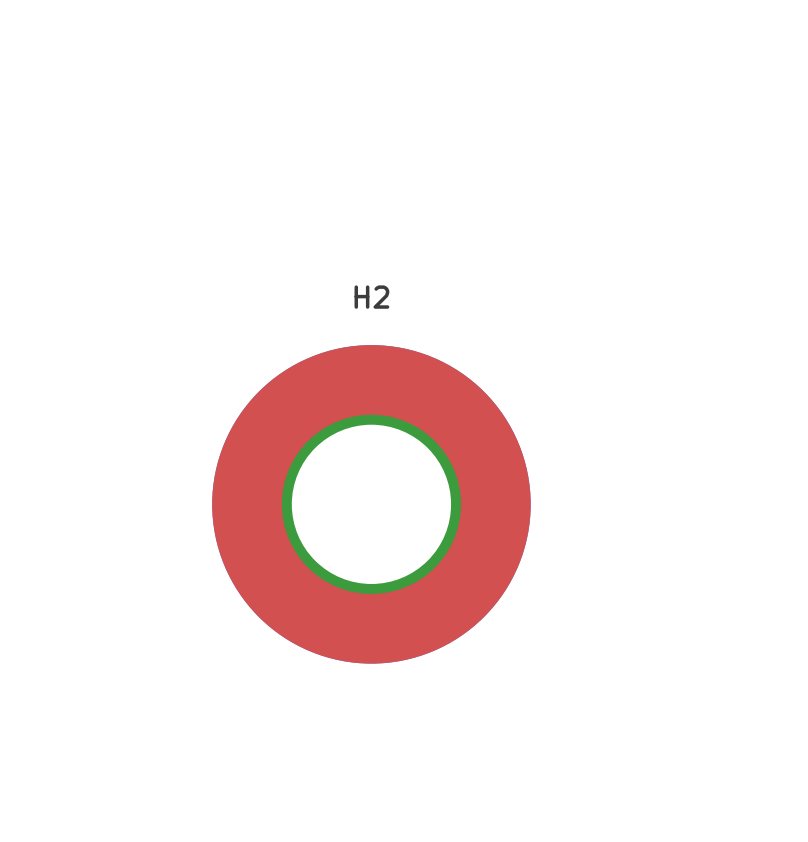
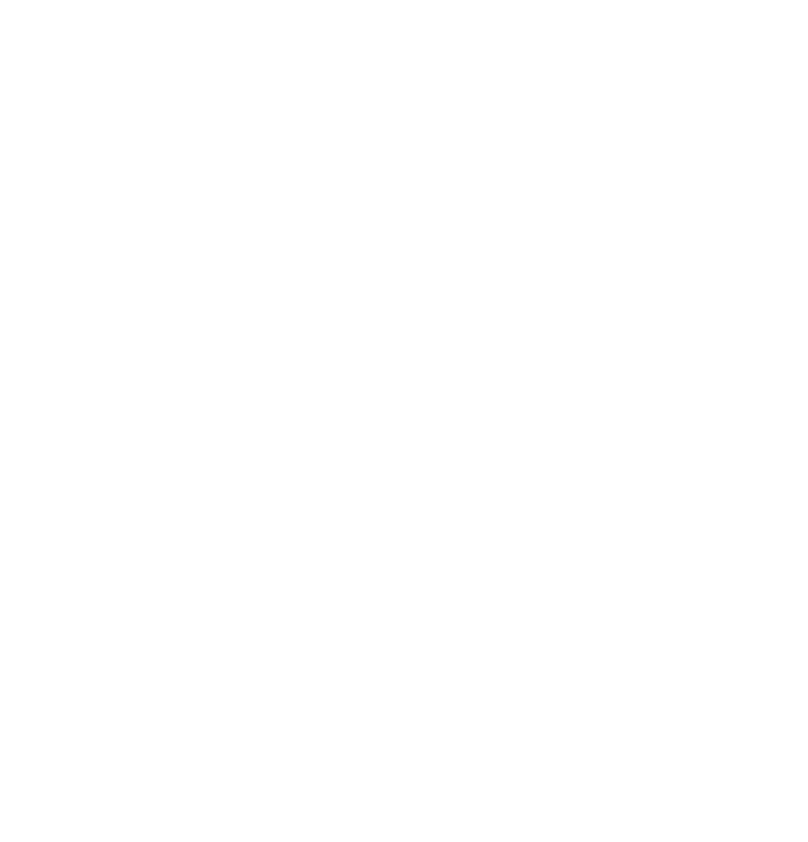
H2: (371, 504) -> none

